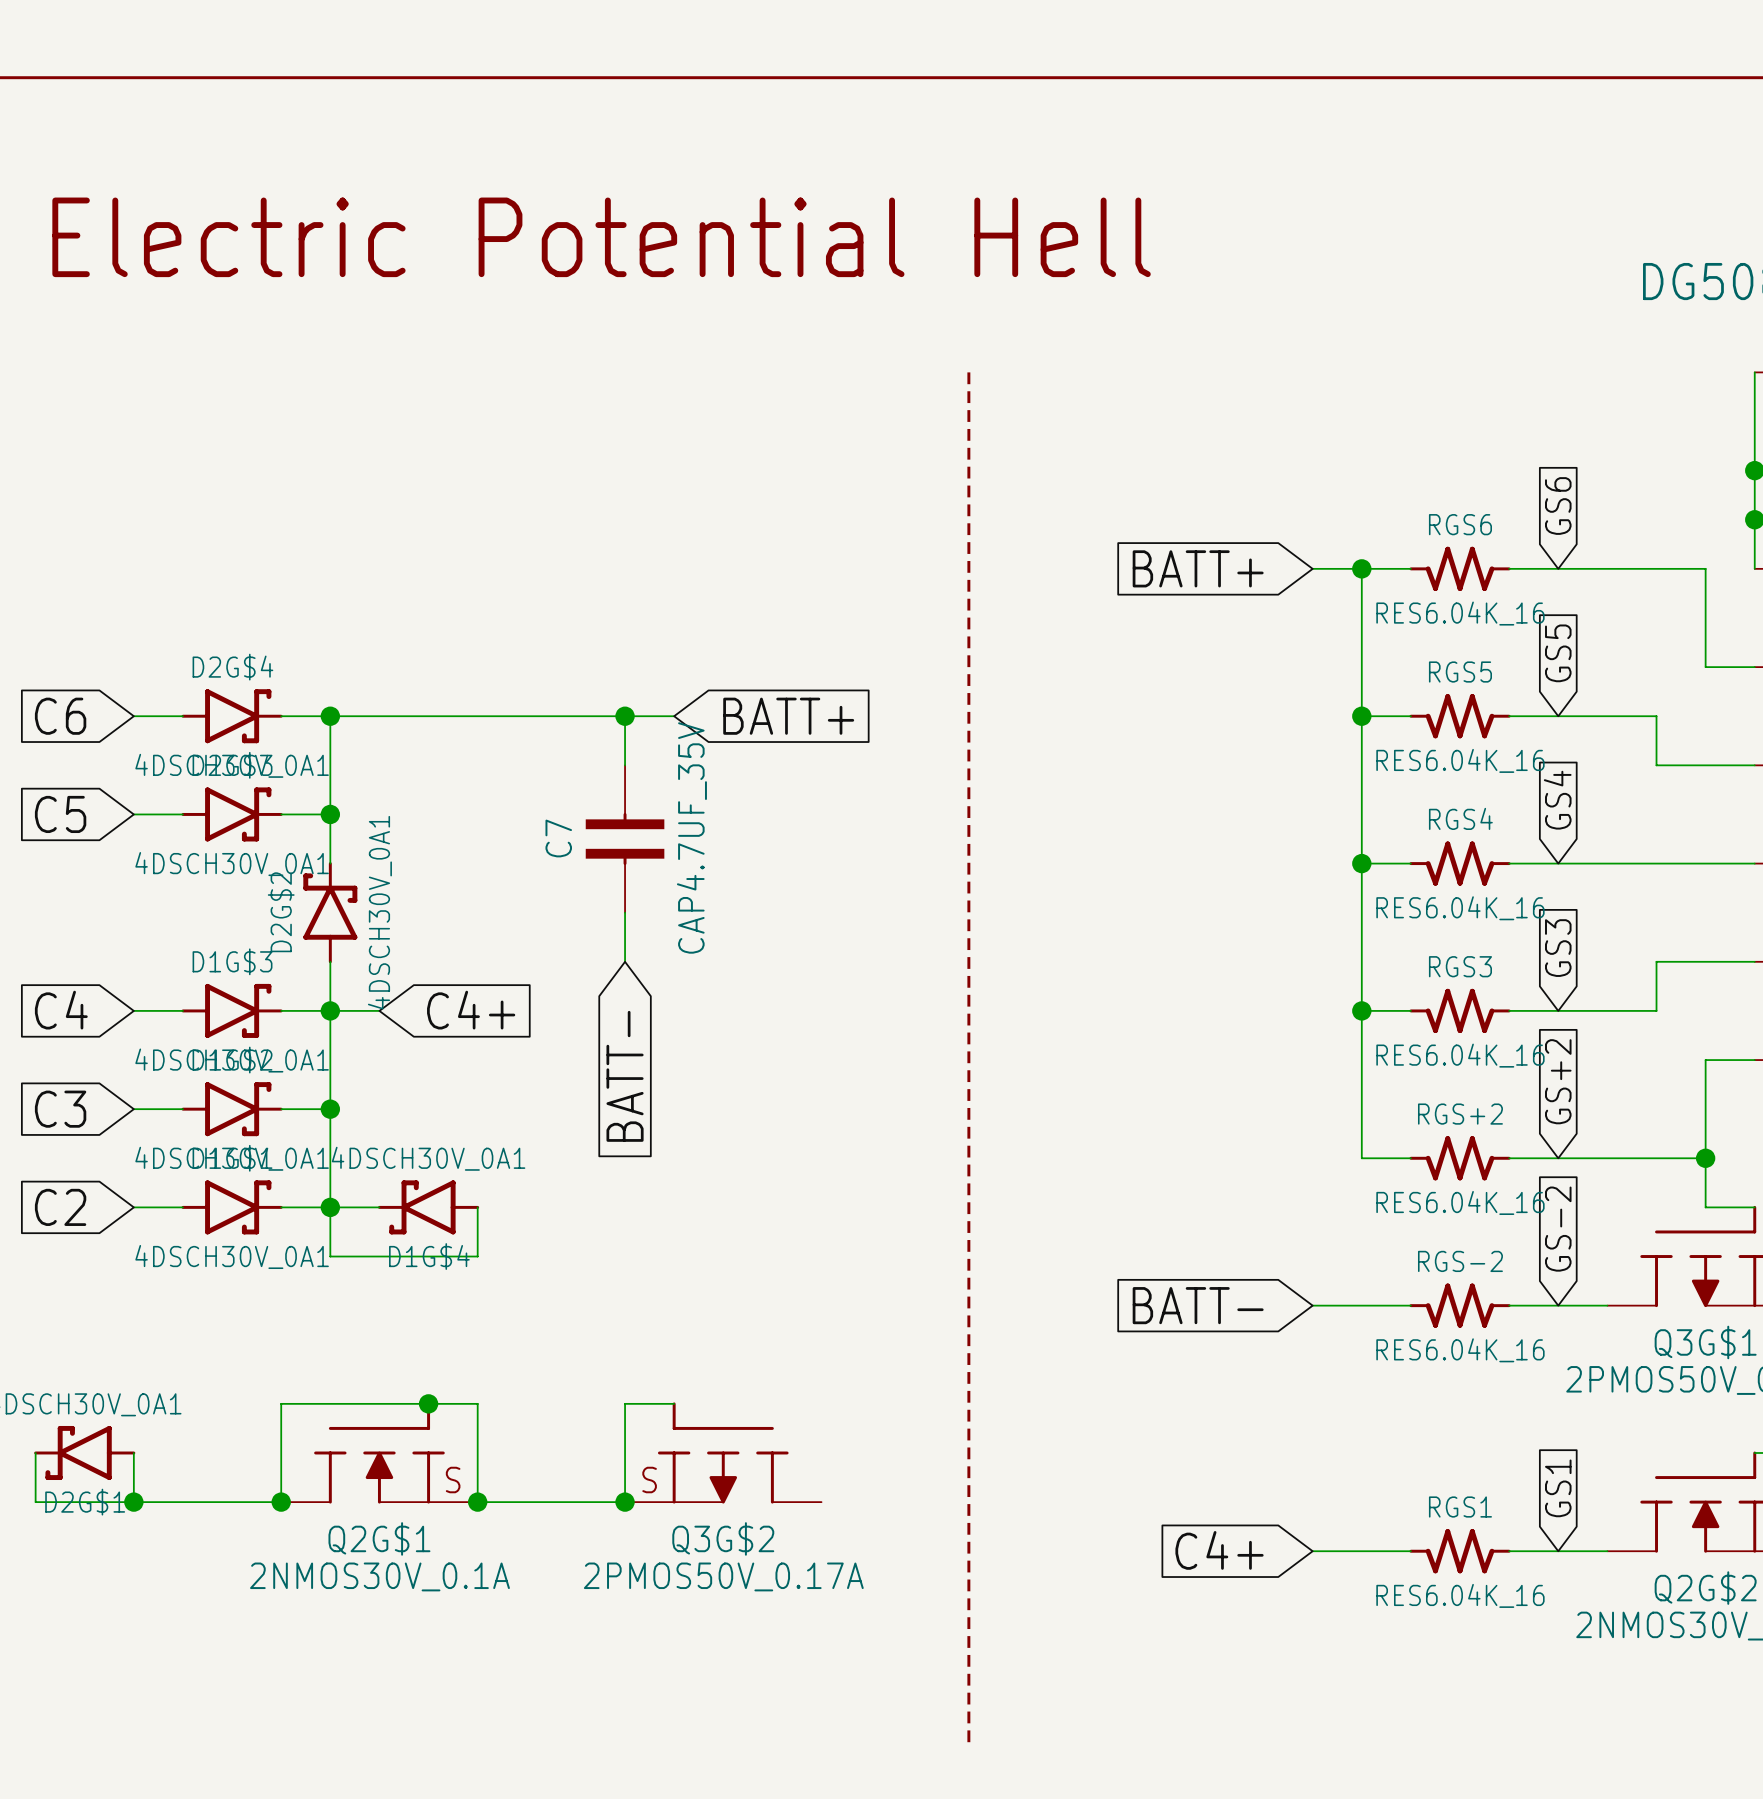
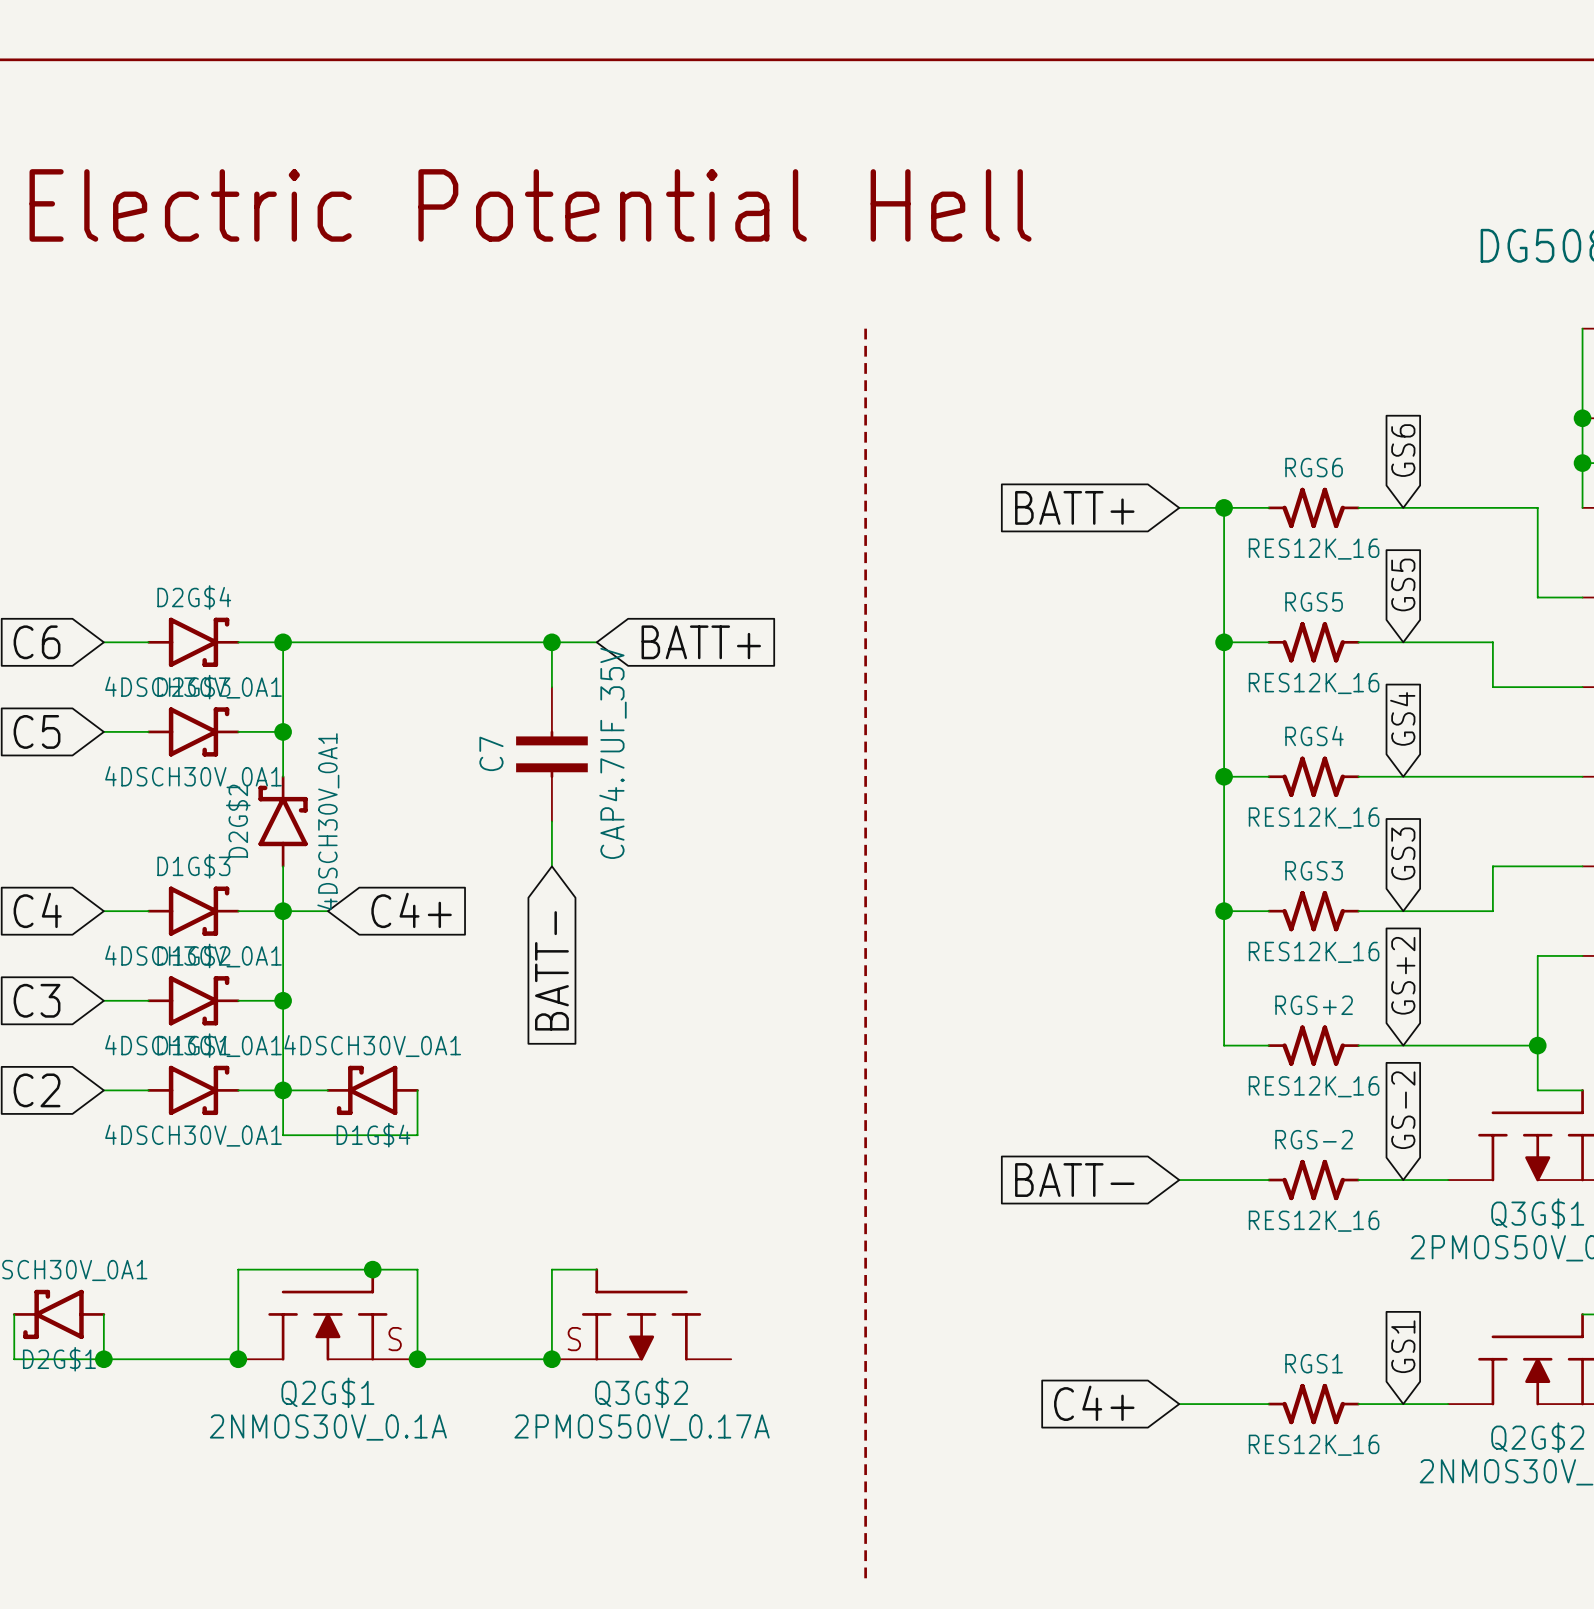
RGS6 value: RES6.04K_16 (1460, 613) -> RES12K_16 (1314, 549)
RGS5 value: RES6.04K_16 (1460, 760) -> RES12K_16 (1314, 683)
RGS4 value: RES6.04K_16 (1460, 908) -> RES12K_16 (1314, 817)
RGS3 value: RES6.04K_16 (1460, 1055) -> RES12K_16 (1314, 952)
RGS+2 value: RES6.04K_16 (1460, 1202) -> RES12K_16 (1314, 1086)
RGS-2 value: RES6.04K_16 (1460, 1350) -> RES12K_16 (1314, 1221)
RGS1 value: RES6.04K_16 (1460, 1595) -> RES12K_16 (1314, 1445)

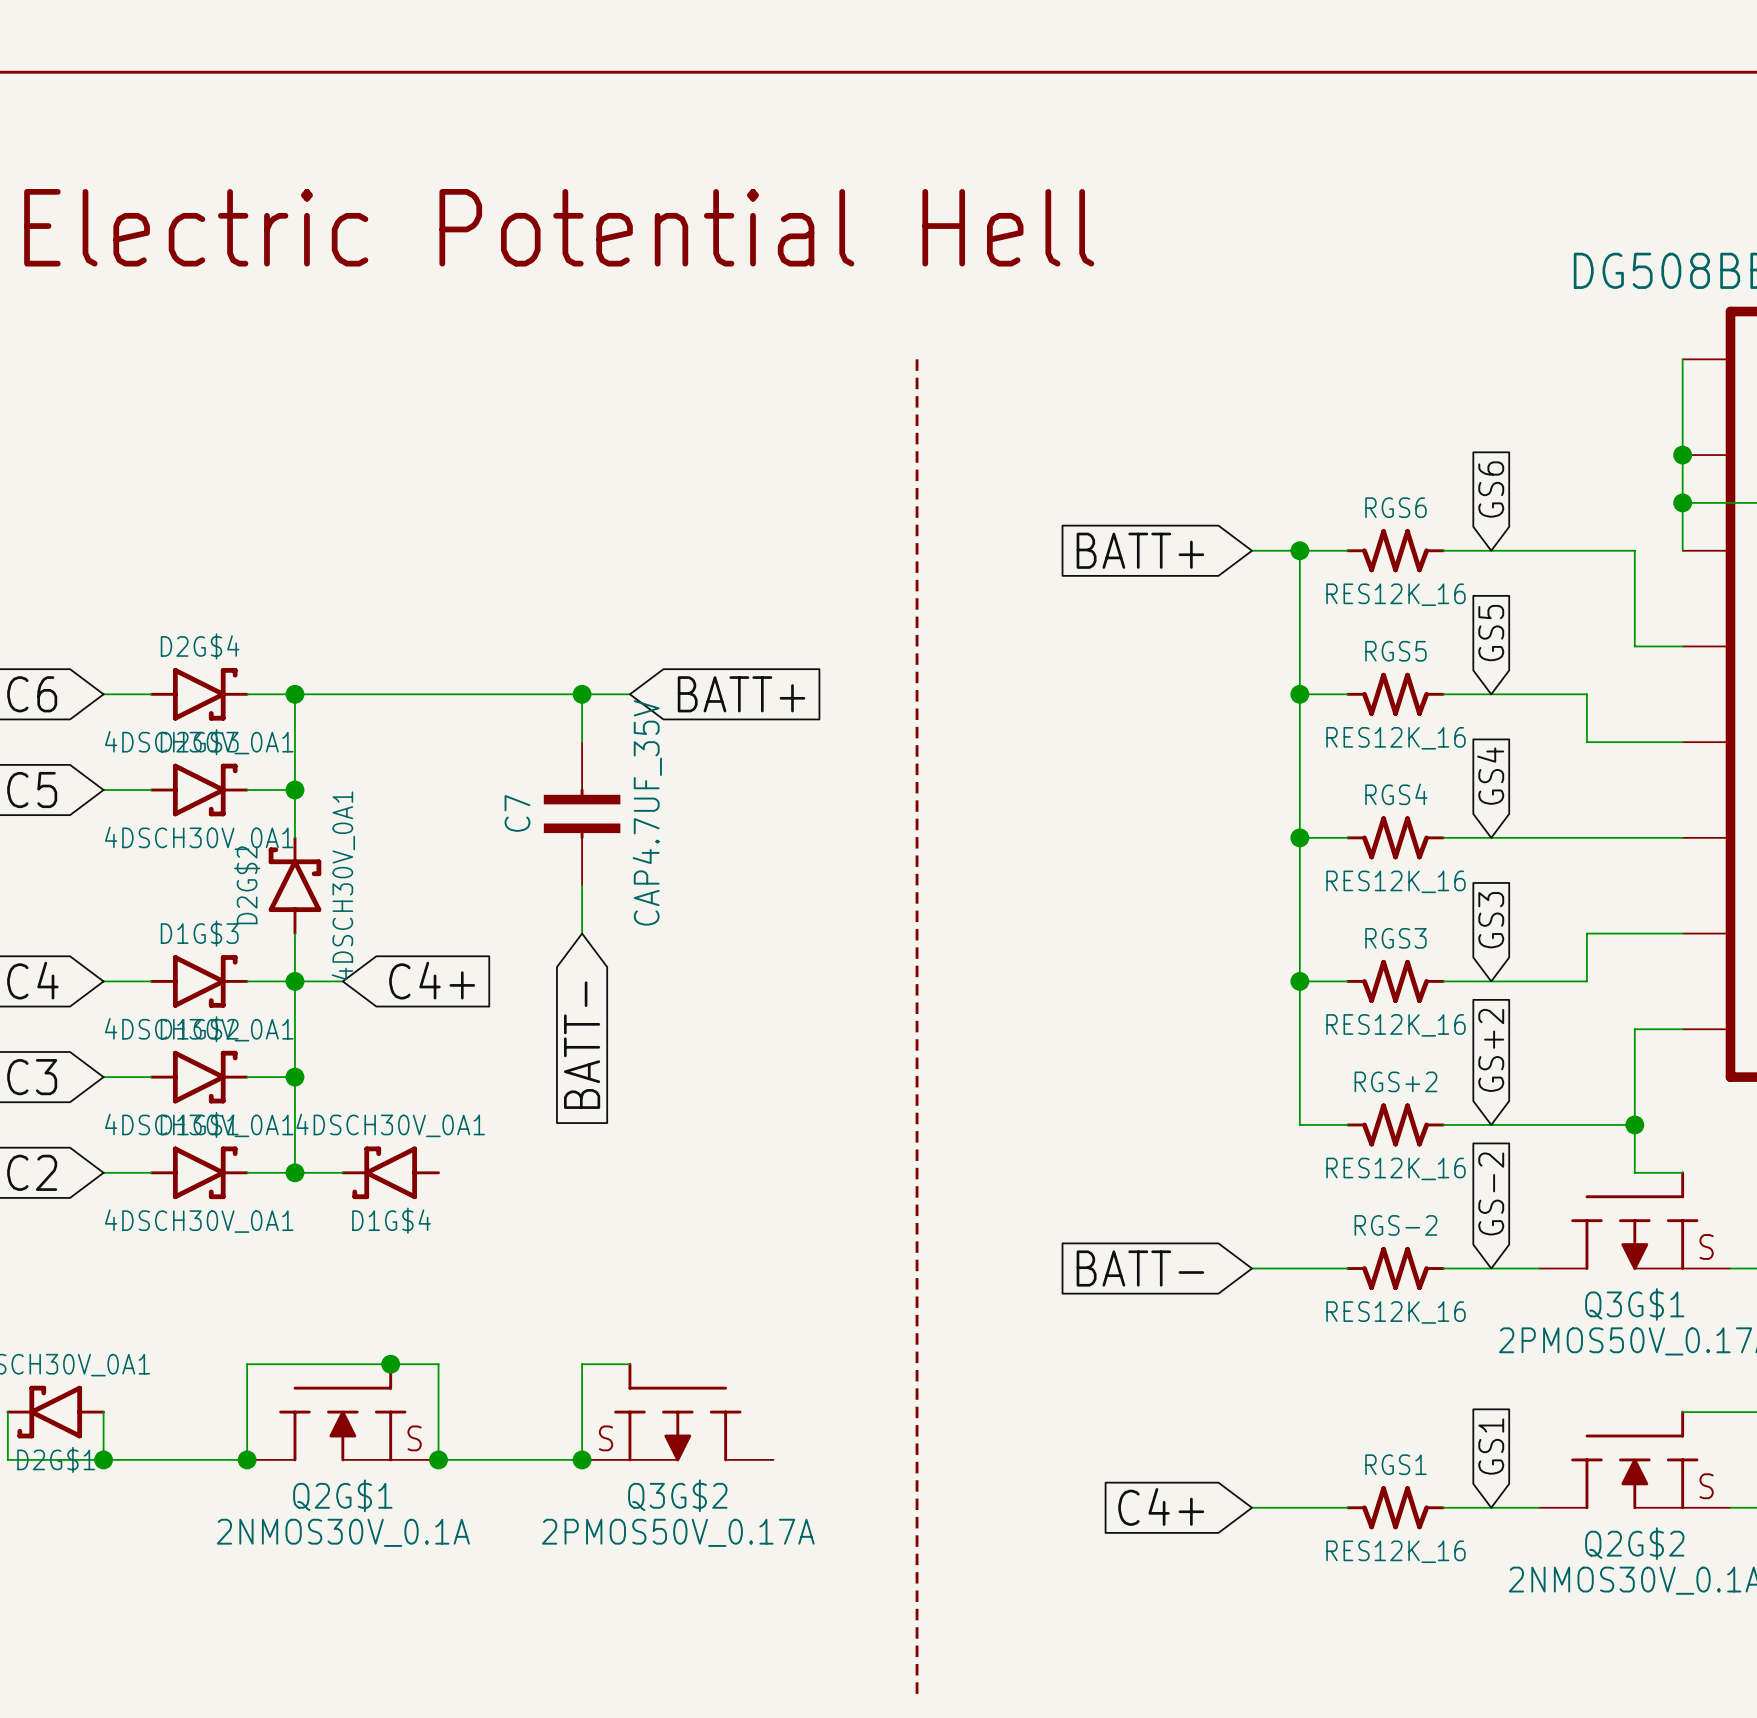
wire: (283, 1090) (283, 1135) (417, 1135) (417, 1090) -> none

